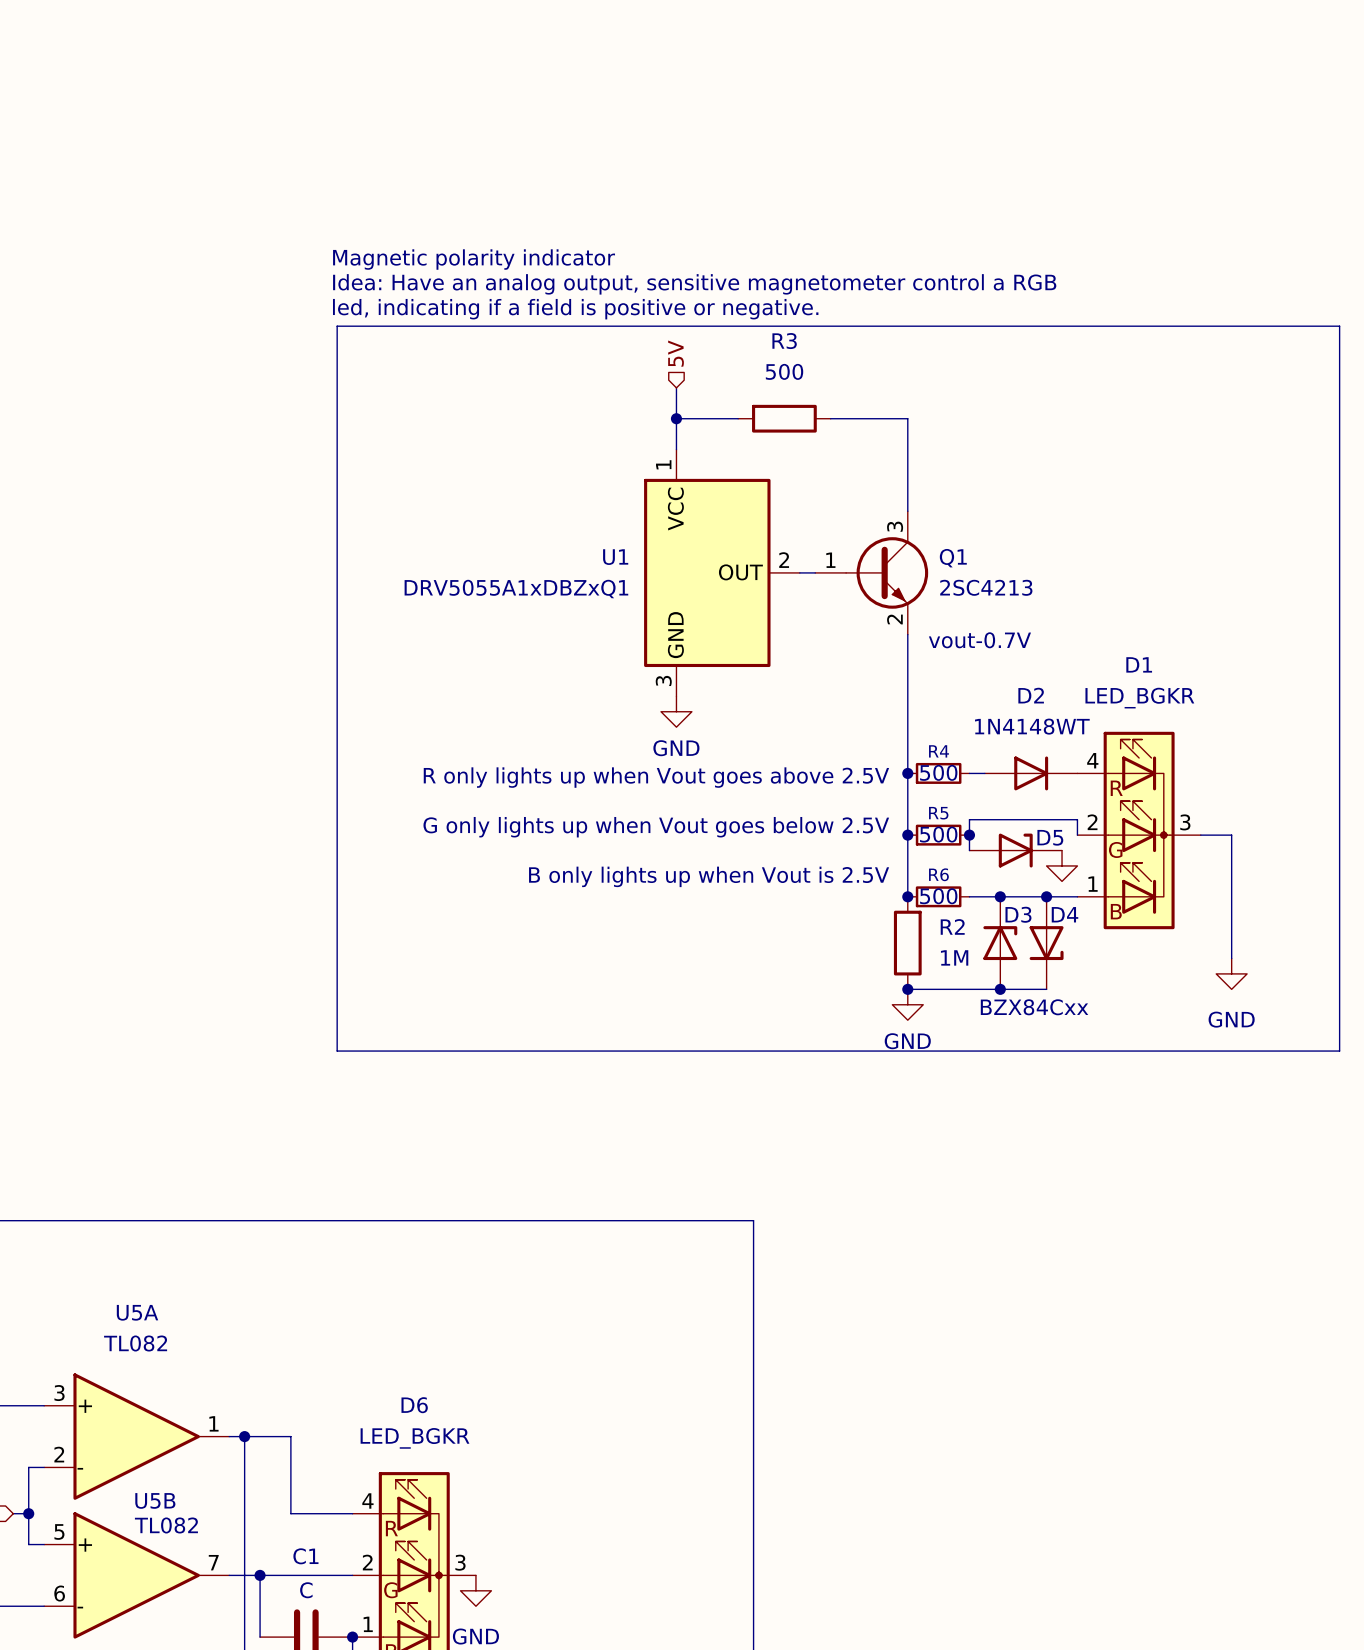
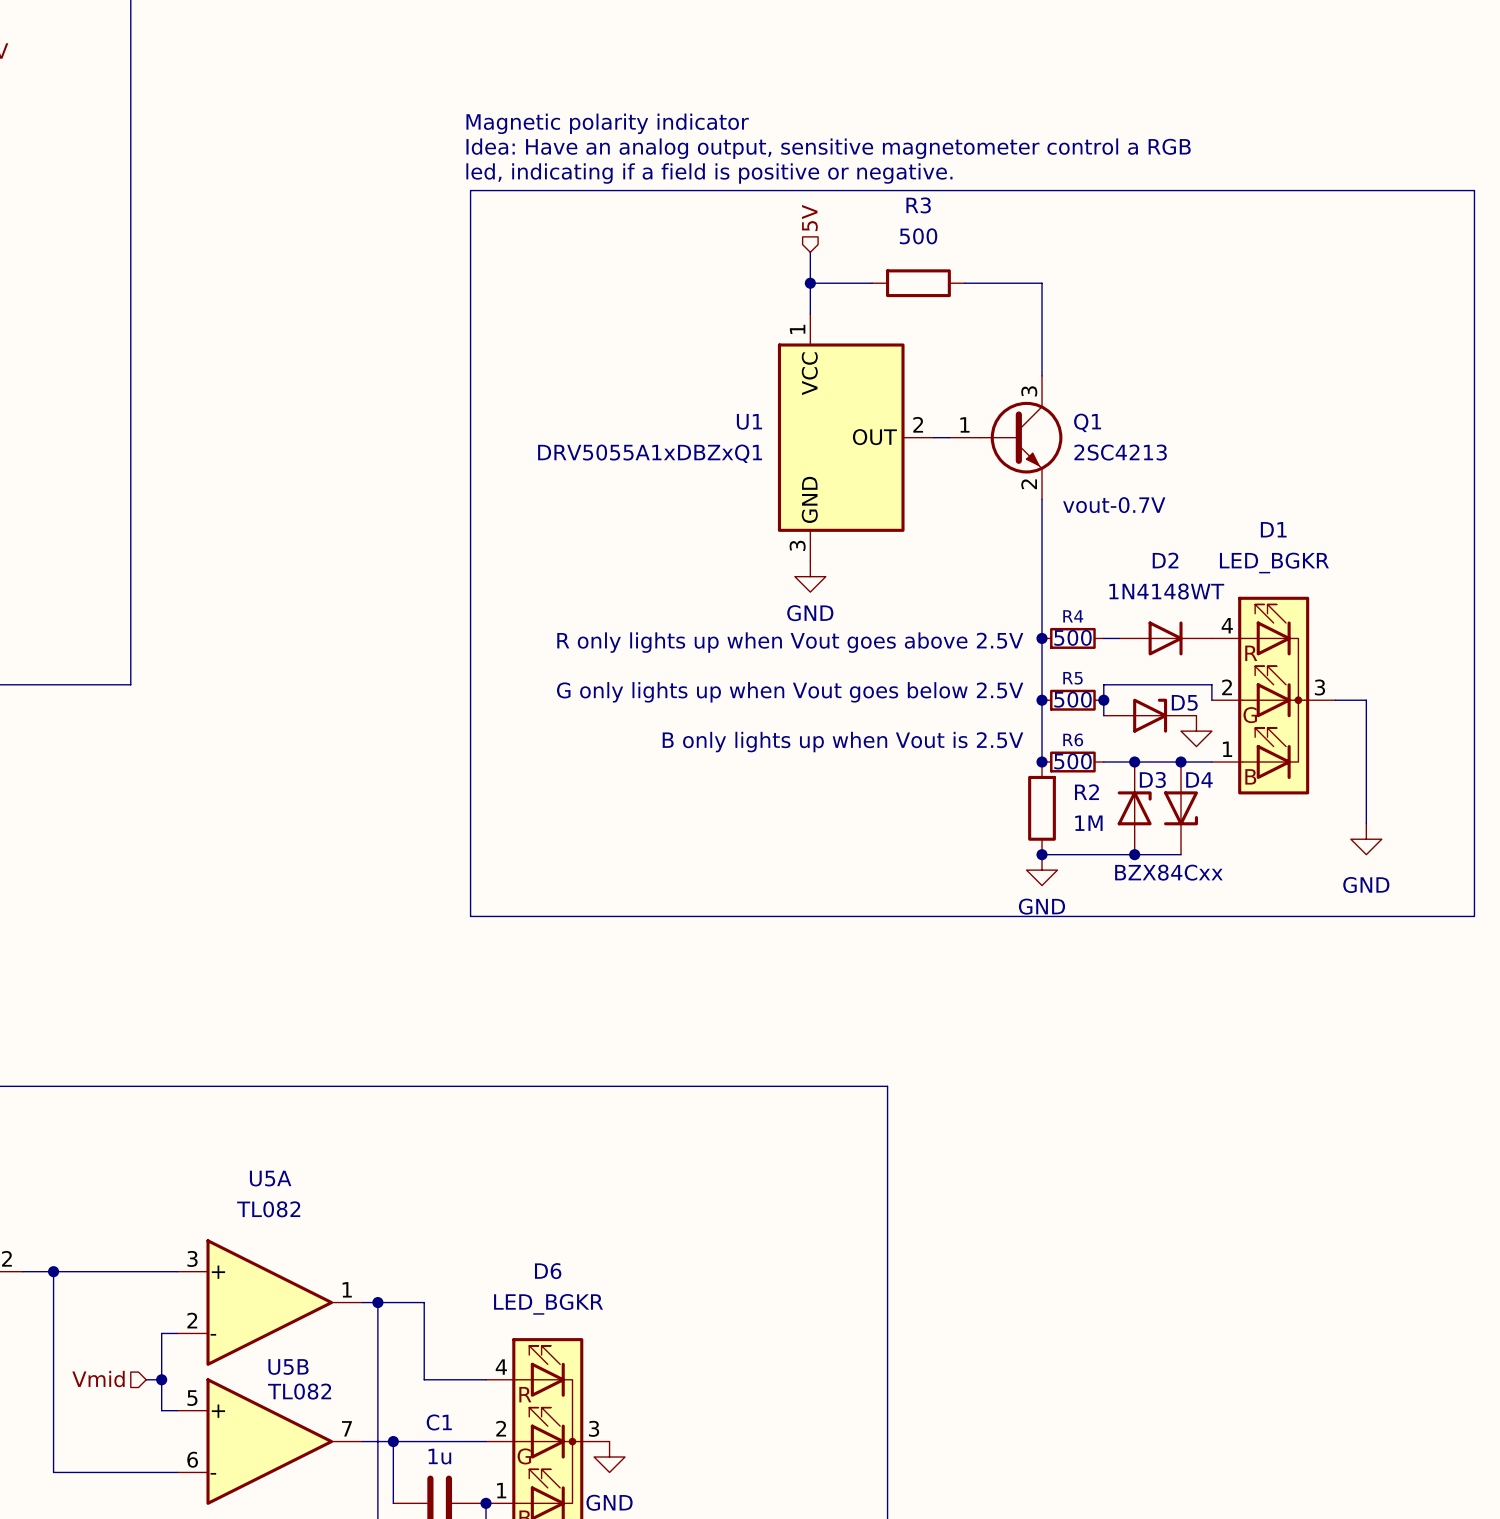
C1 value: C (306, 1590) -> 1u (439, 1456)

